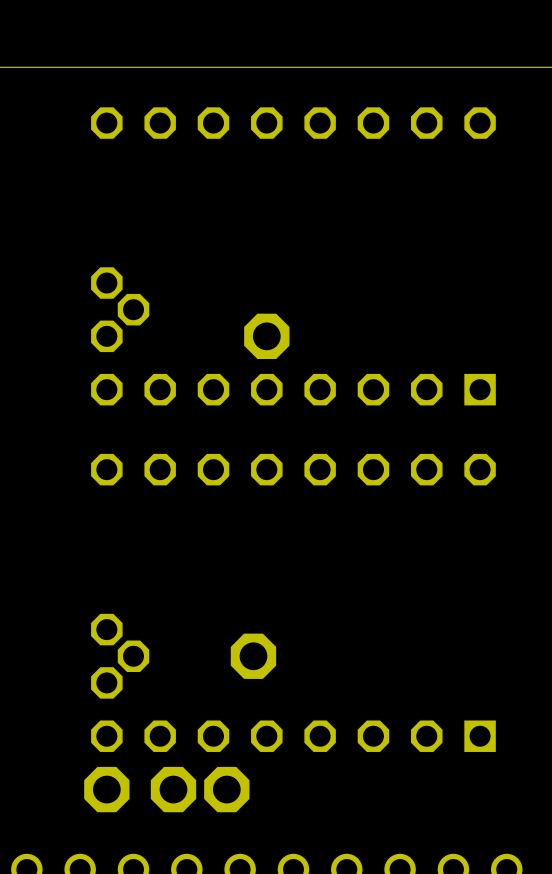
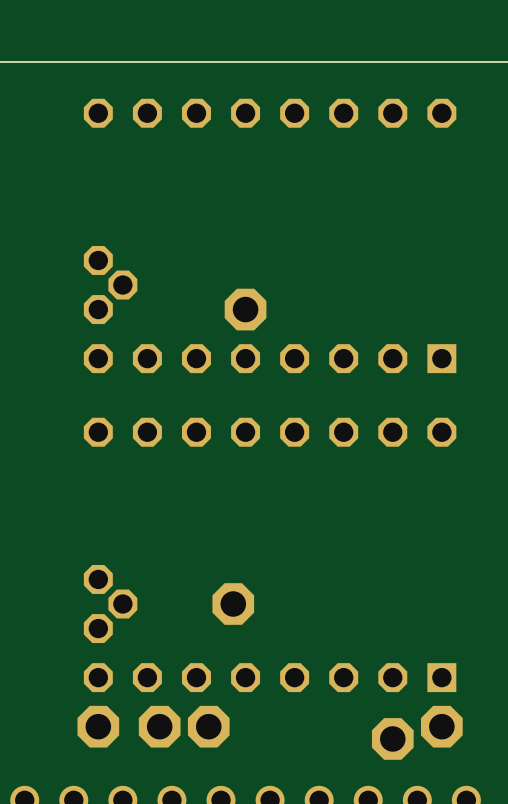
part: none -> (441, 726)
part: none -> (392, 738)

